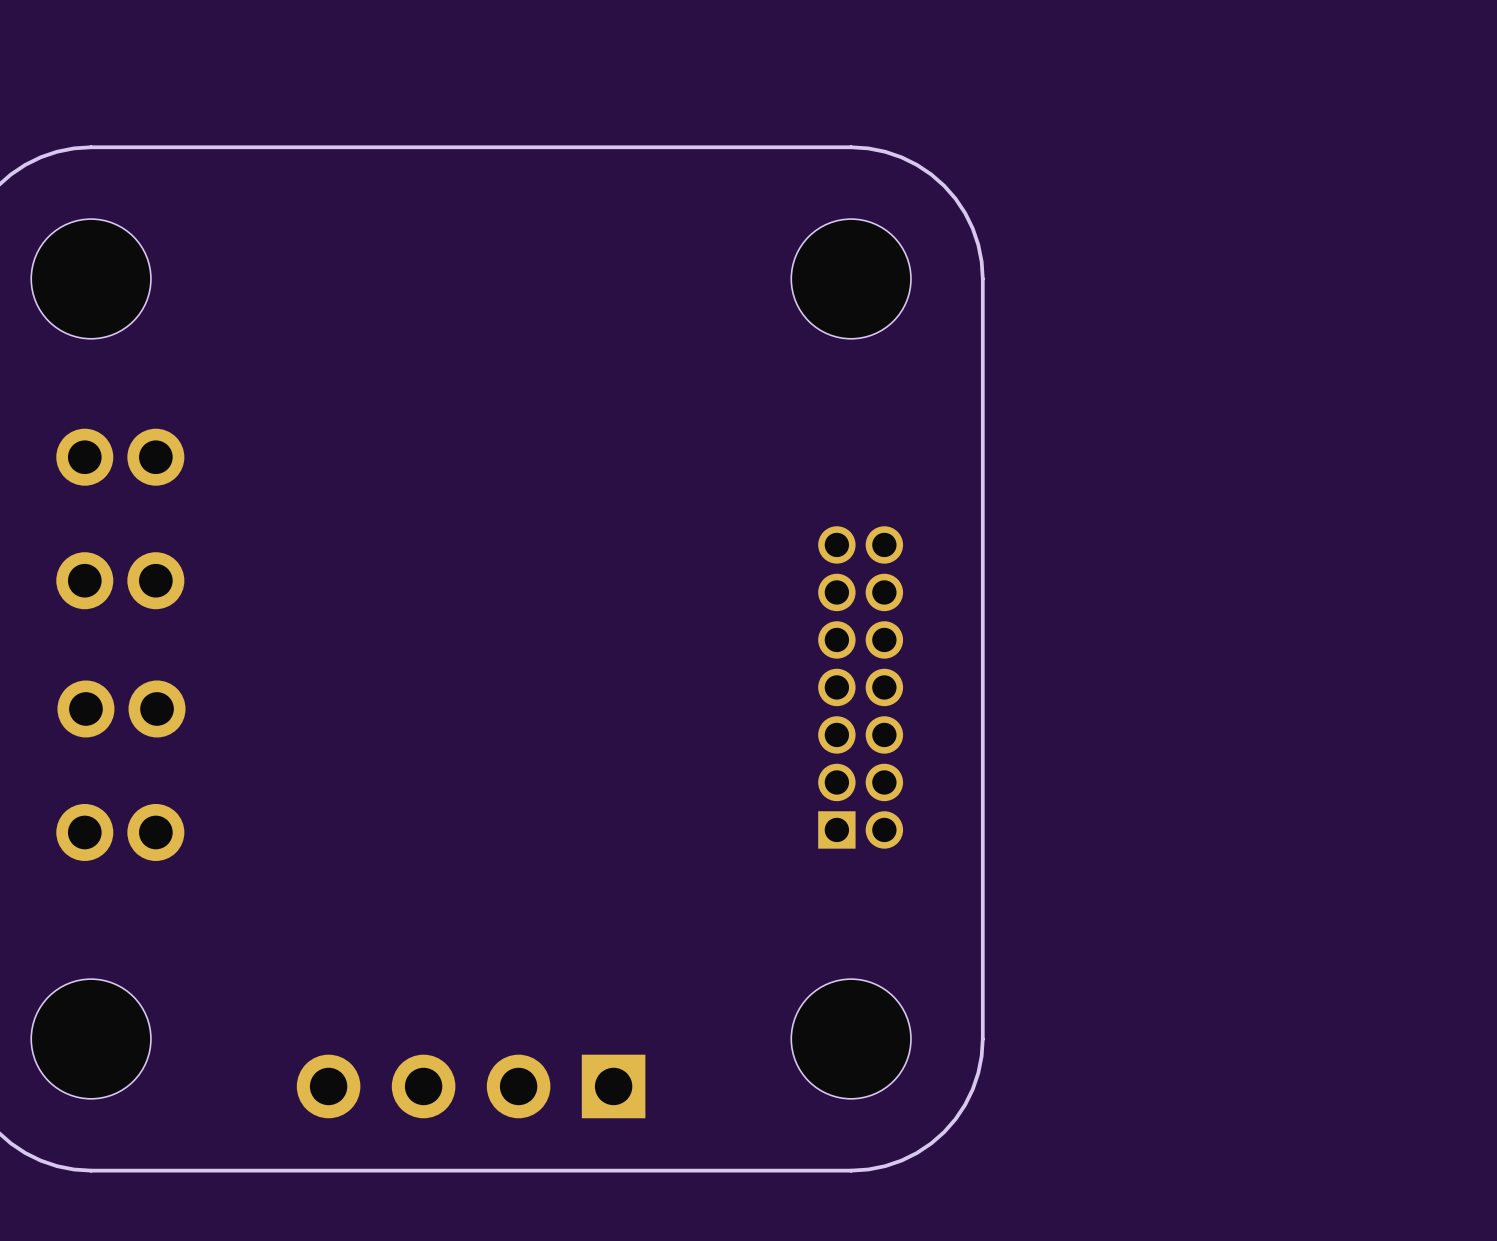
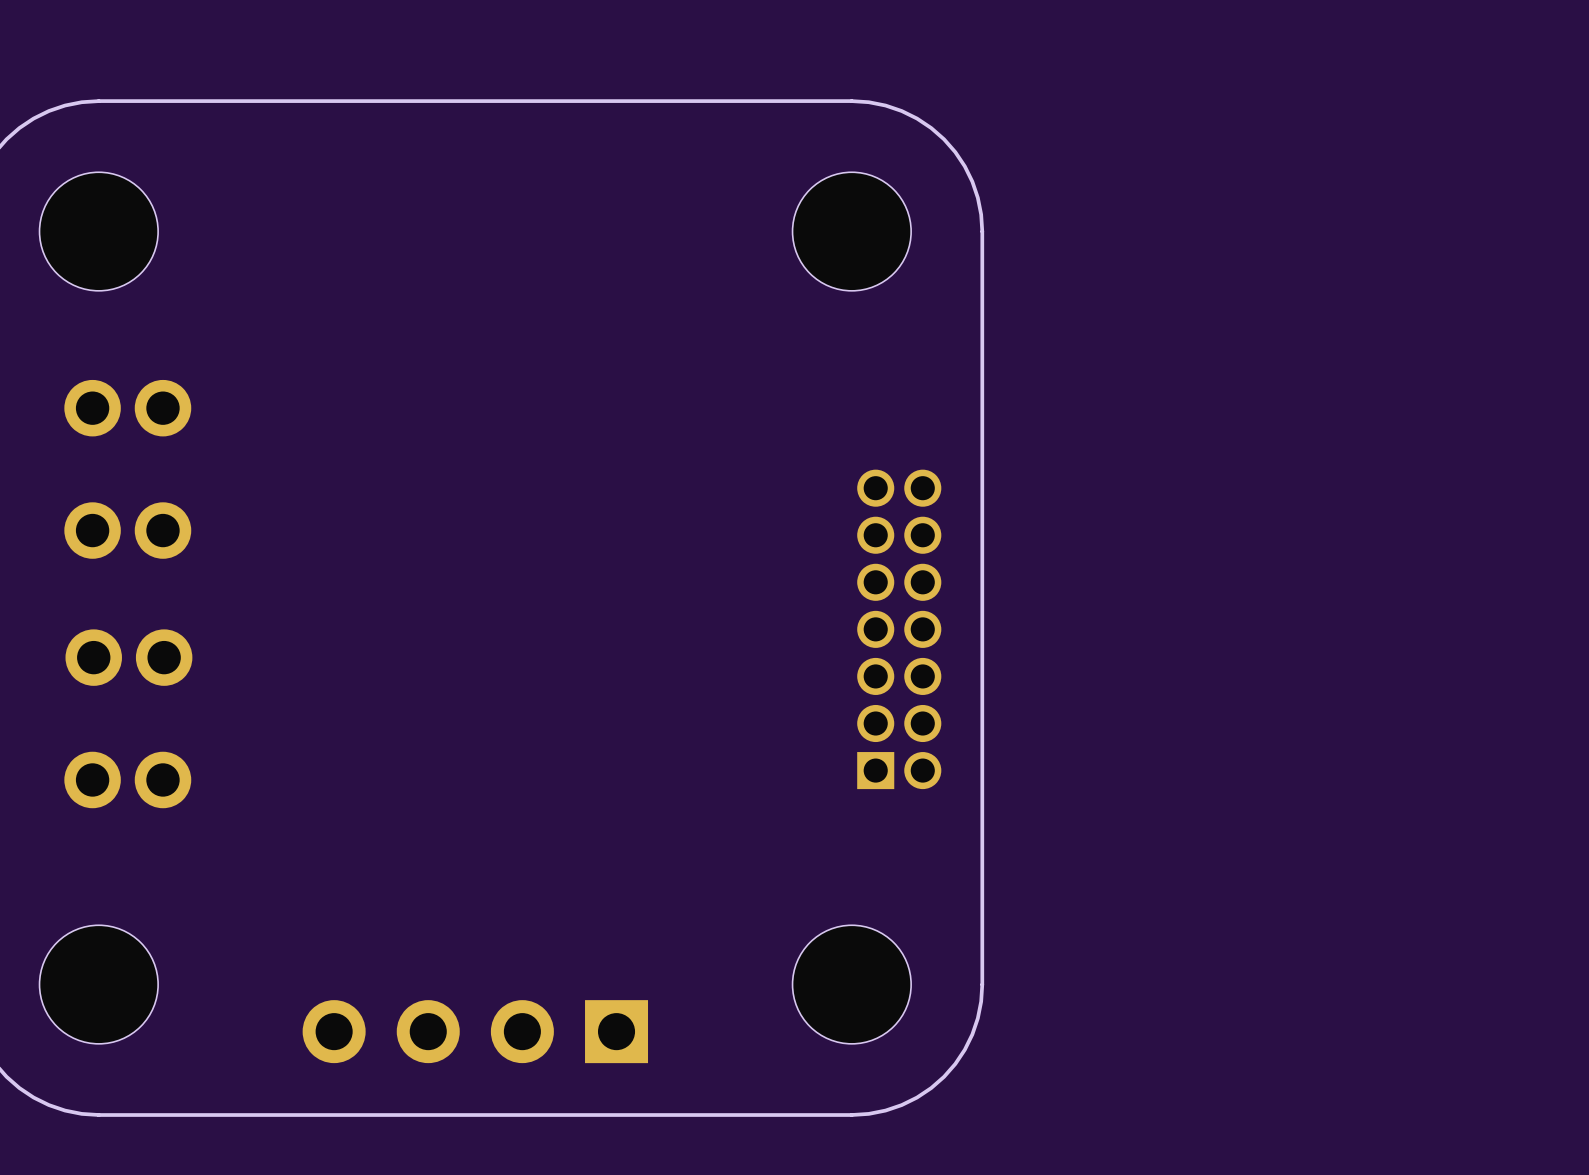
part position: (860, 687) -> (899, 629)

